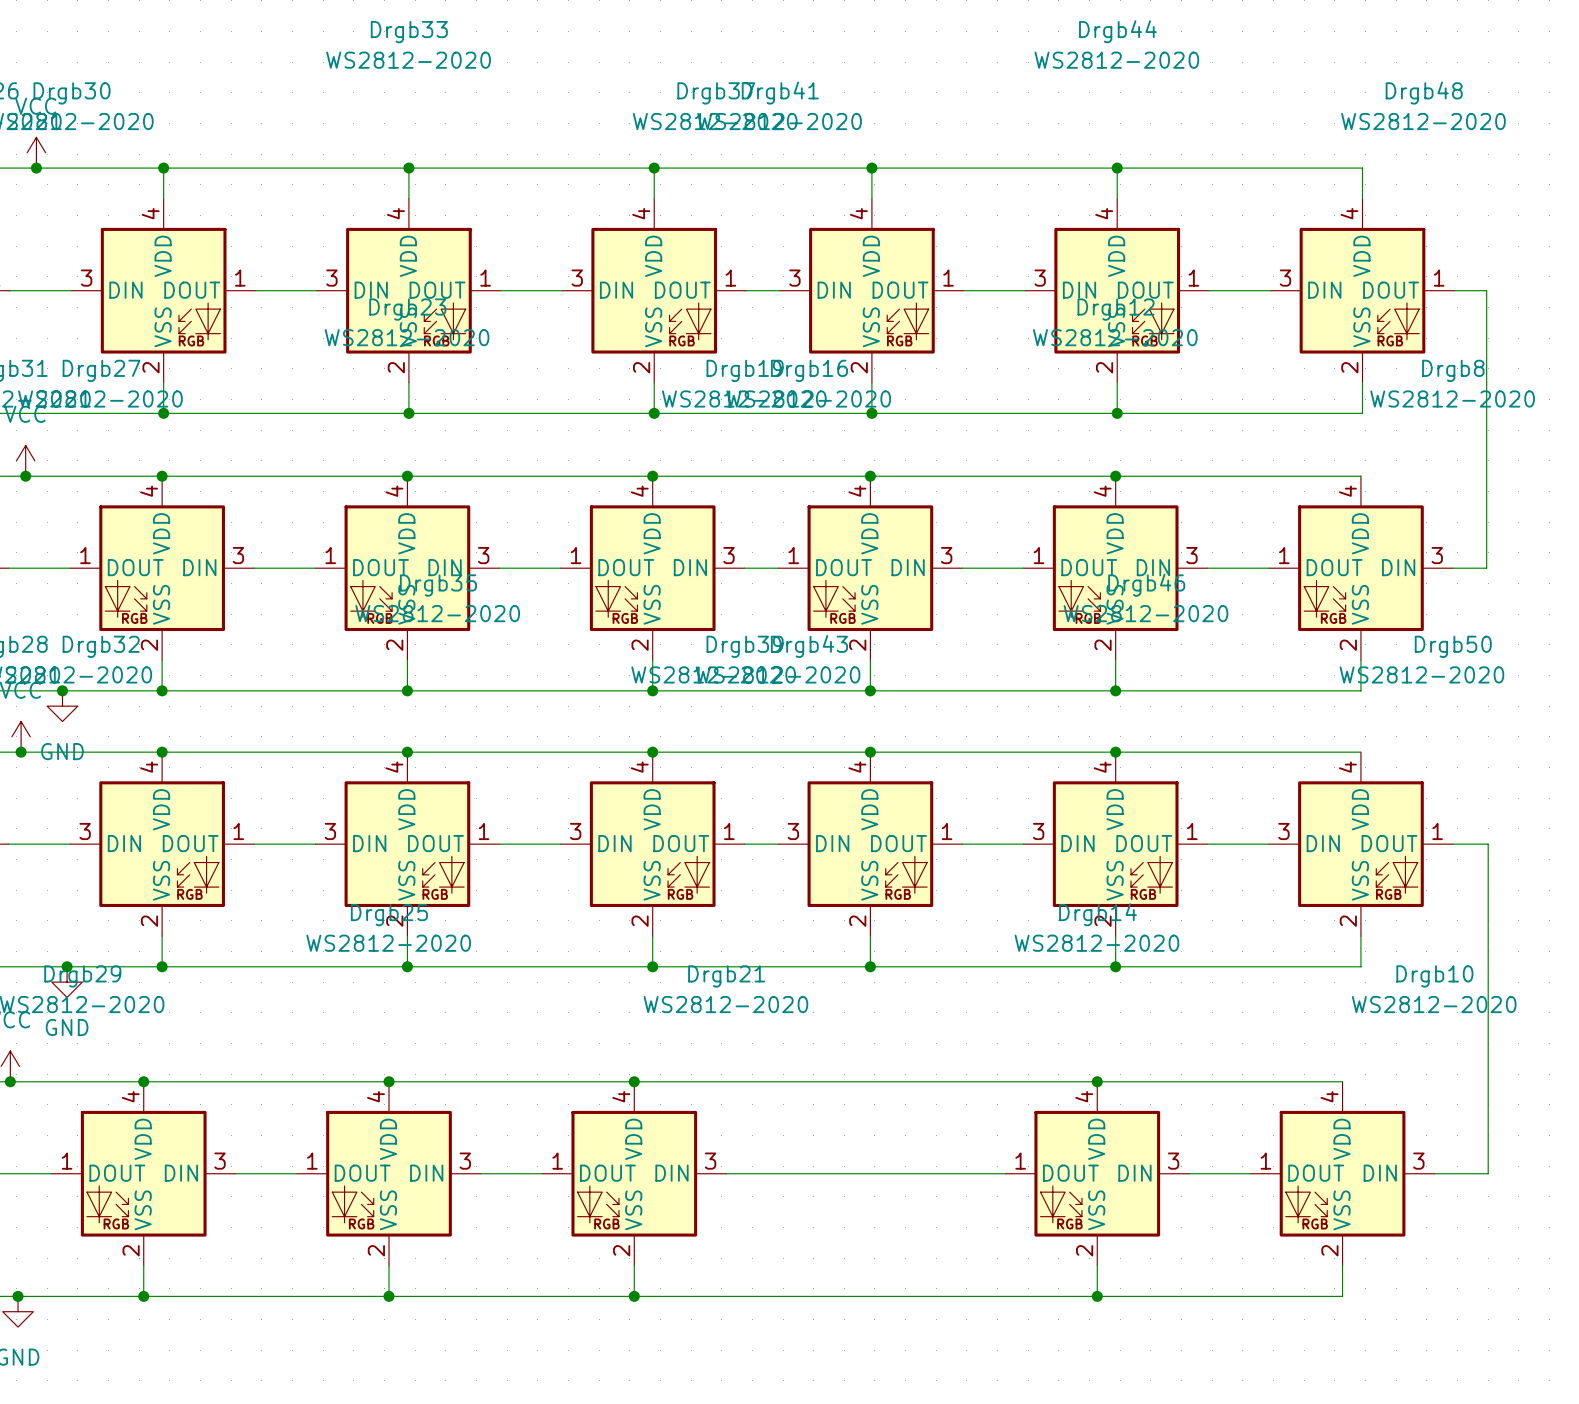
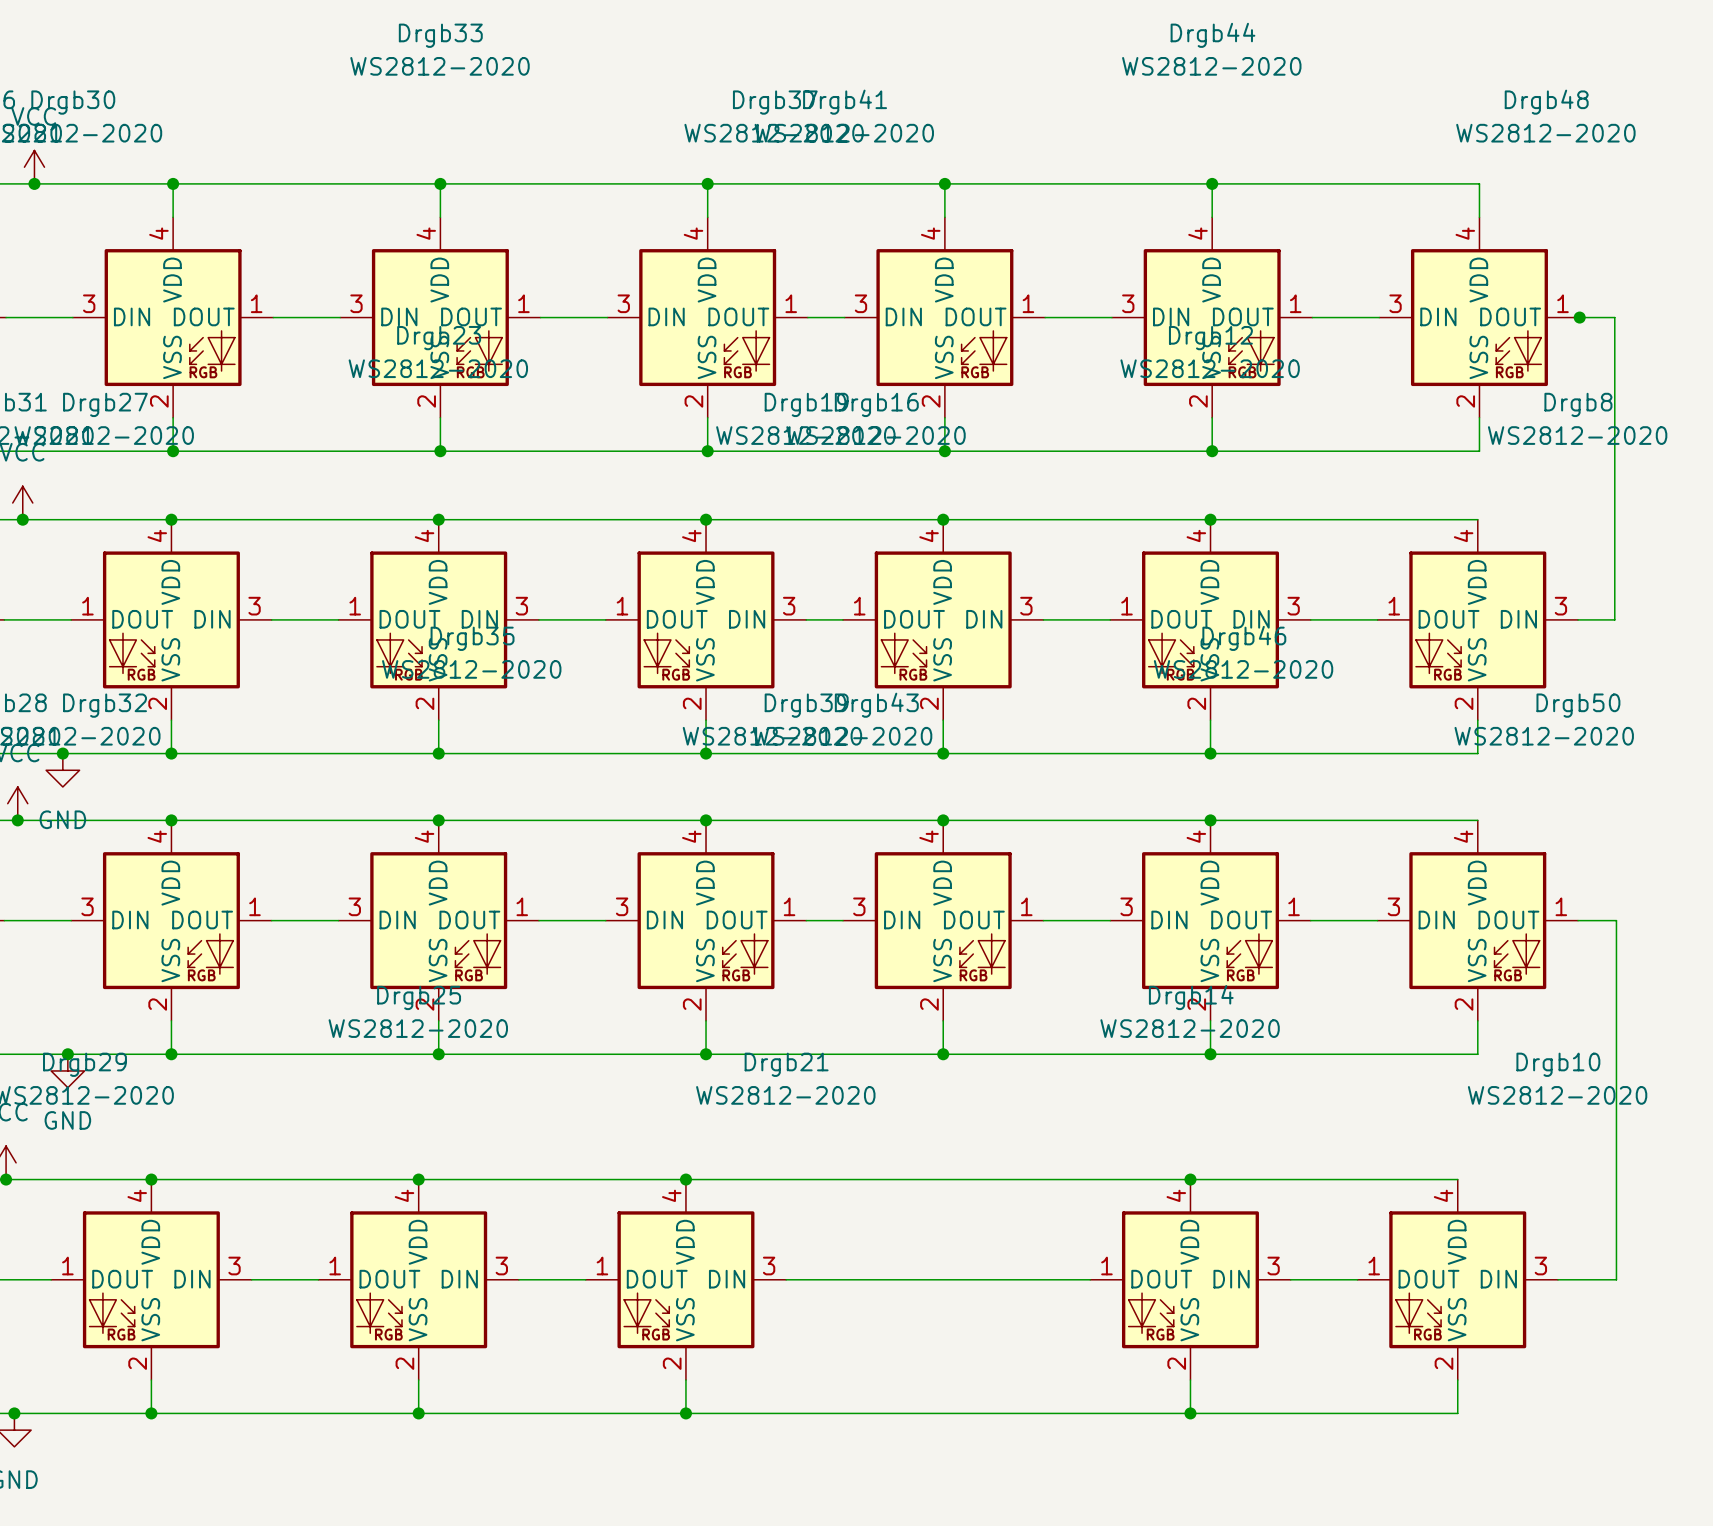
junction: none -> (1579, 317)

